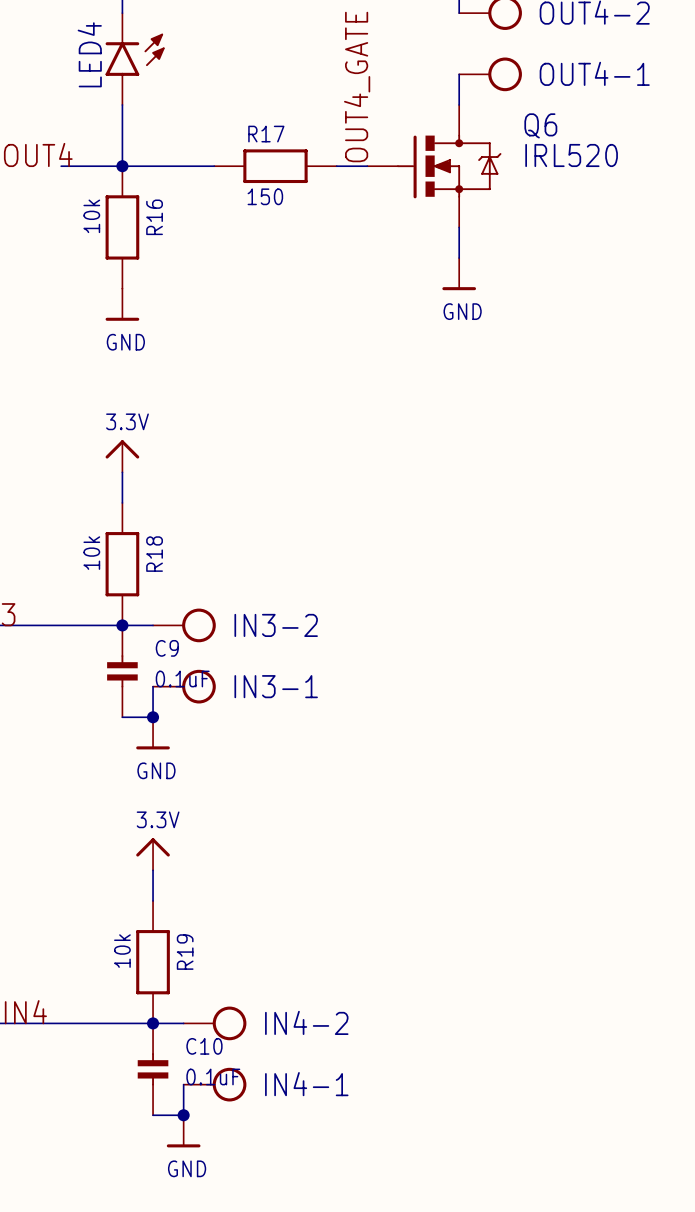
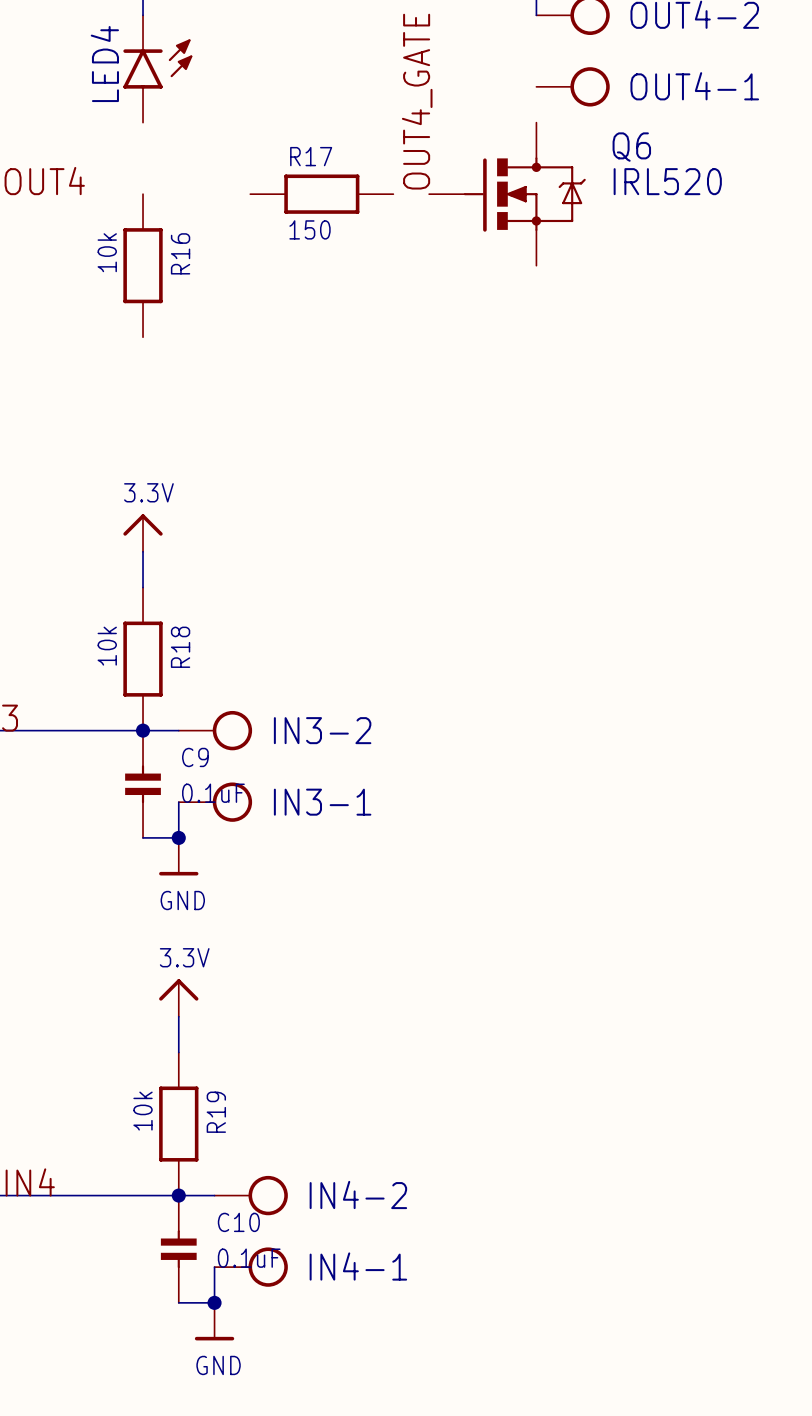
wire: (459, 74) (459, 104) -> none
wire: (122, 104) (122, 166) -> none
wire: (61, 166) (214, 166) -> none
junction: (122, 166) -> none
wire: (336, 166) (367, 166) -> none
wire: (459, 227) (459, 258) -> none
power symbol: GND (459, 274) -> none
power symbol: GND (122, 304) -> none

